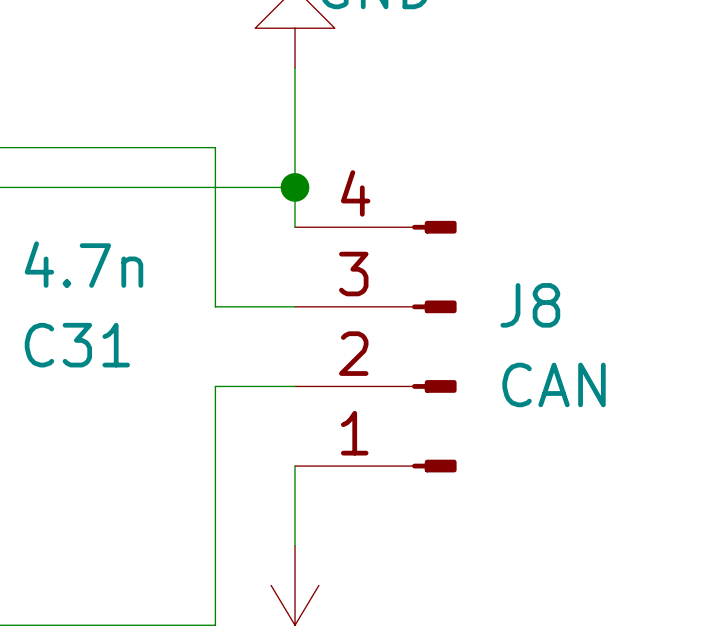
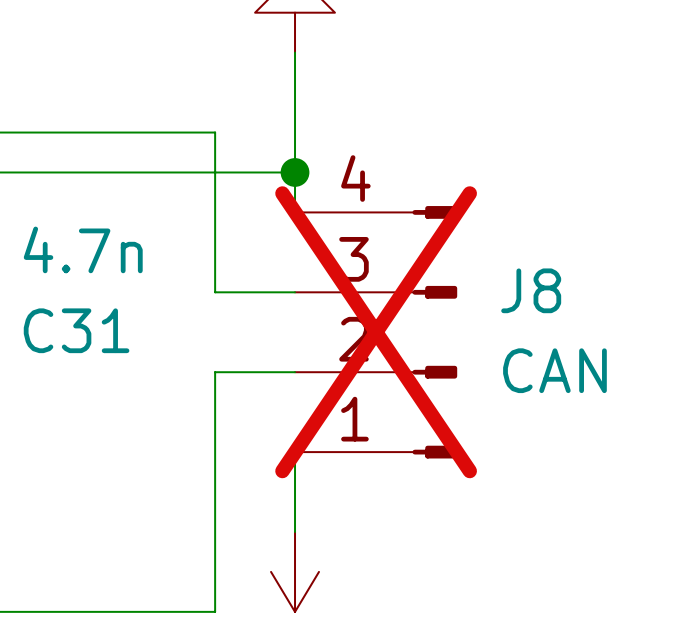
J8 do-not-place cross: none -> (376, 332)

